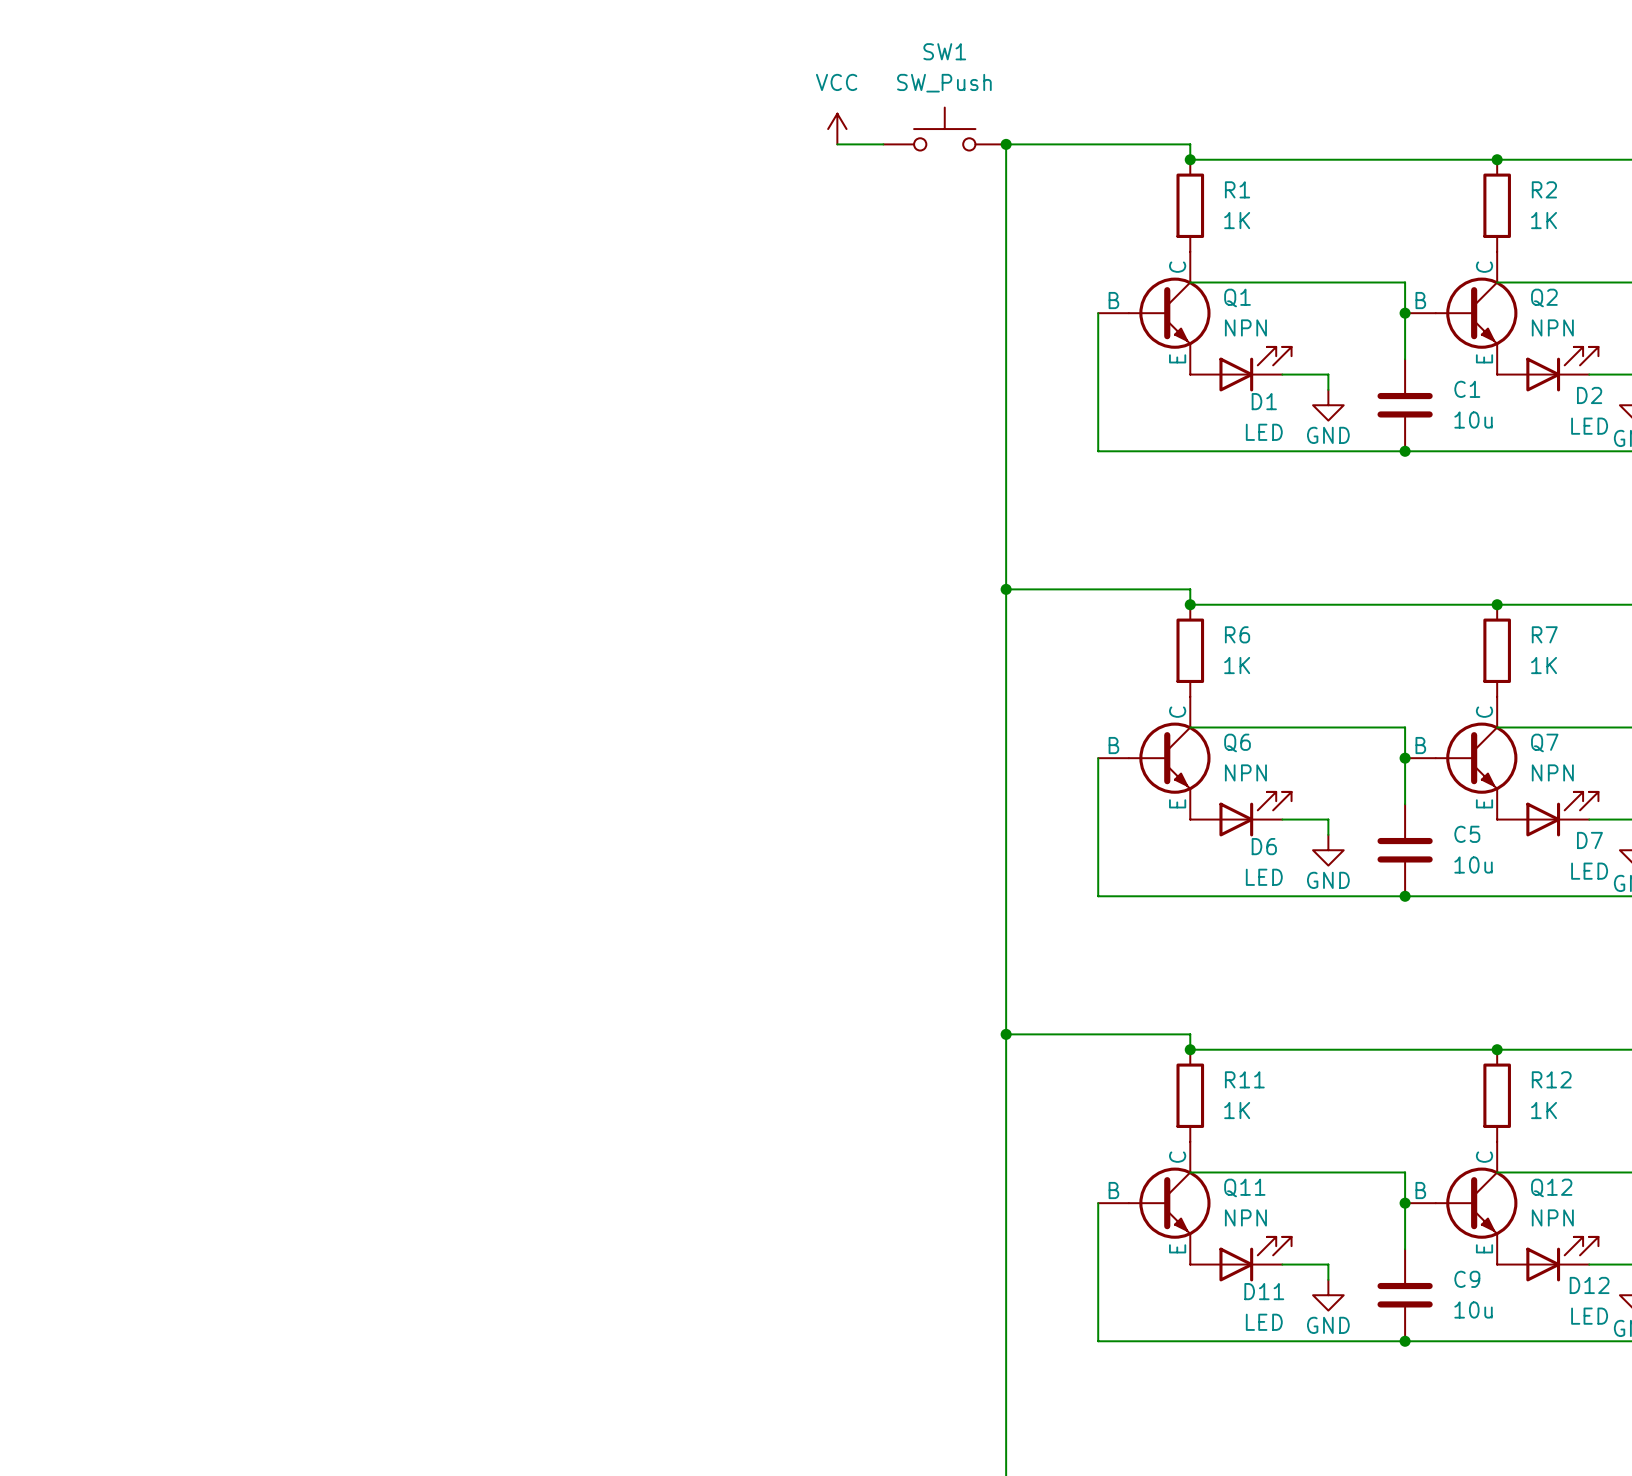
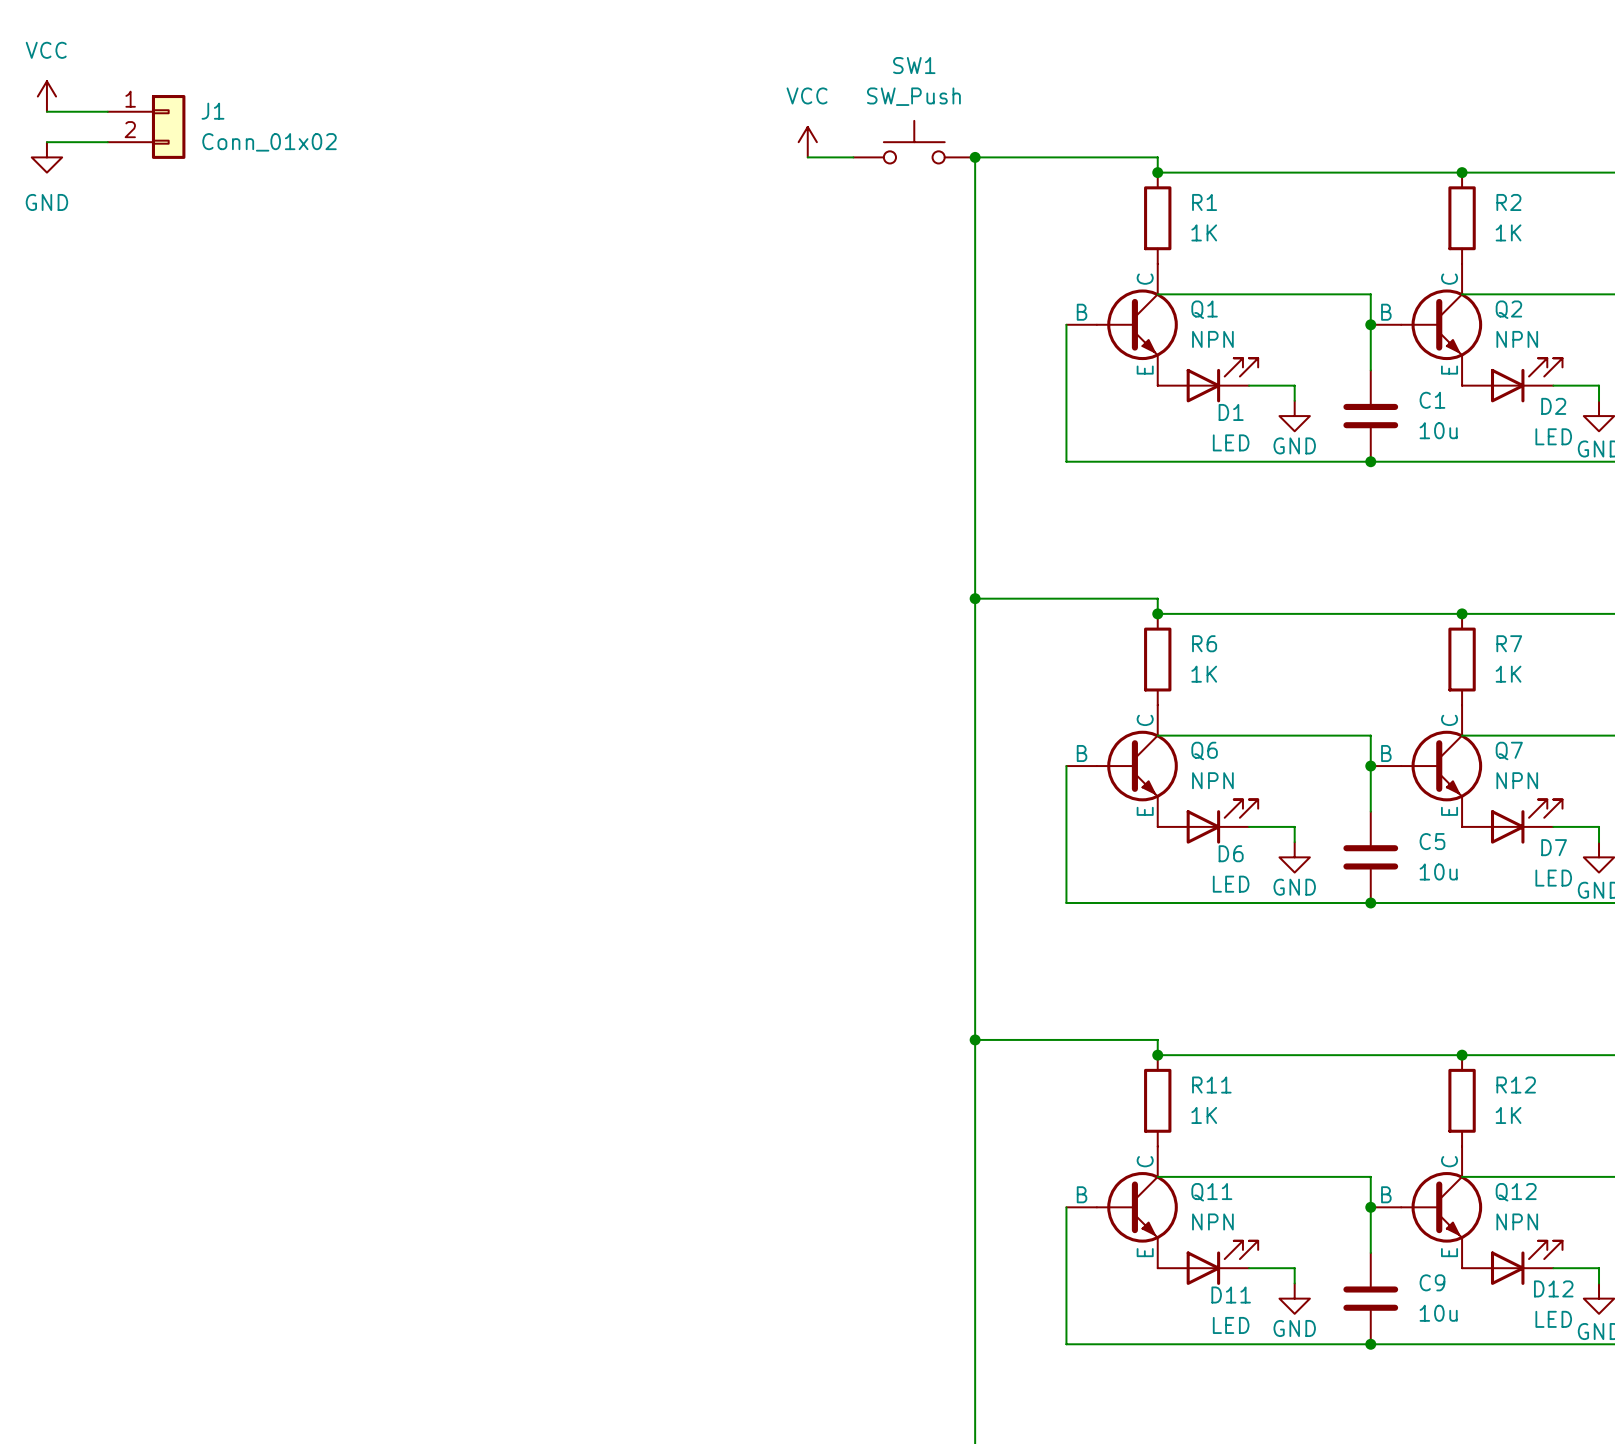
power symbol: none -> VCC (46, 96)
wire: none -> (46, 111) (107, 111)
J1: none -> Conn_01x02 (146, 126)
wire: none -> (46, 142) (107, 142)
power symbol: none -> GND (46, 157)

